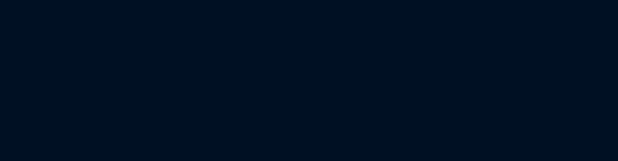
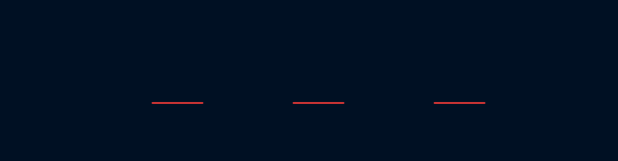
top track: none -> (202, 102) (152, 102)
top track: none -> (343, 102) (293, 102)
top track: none -> (484, 102) (434, 102)

